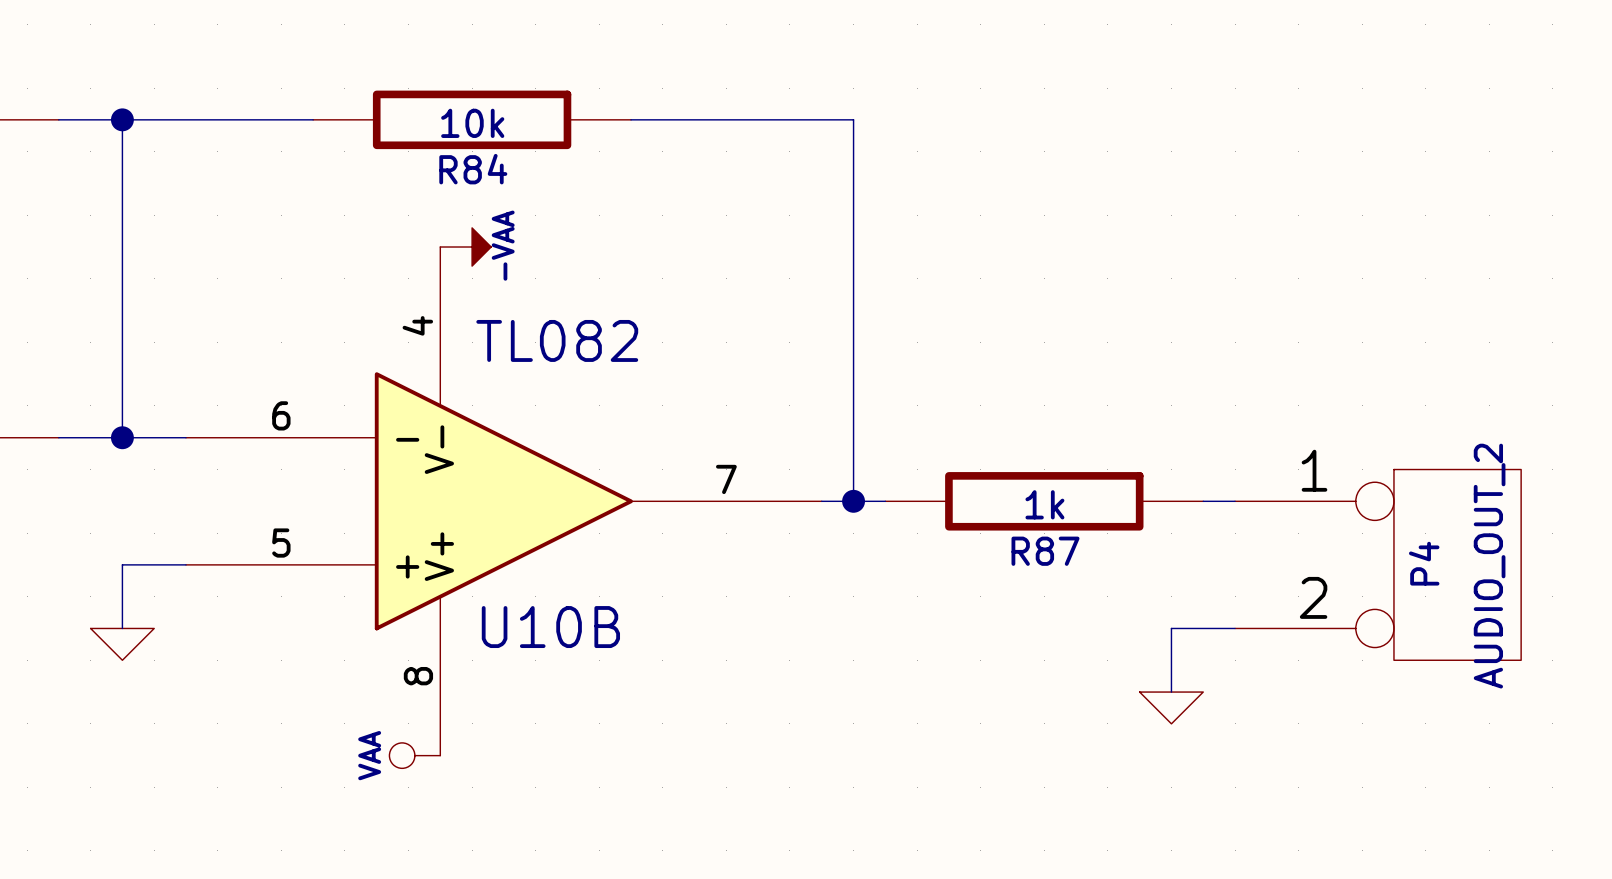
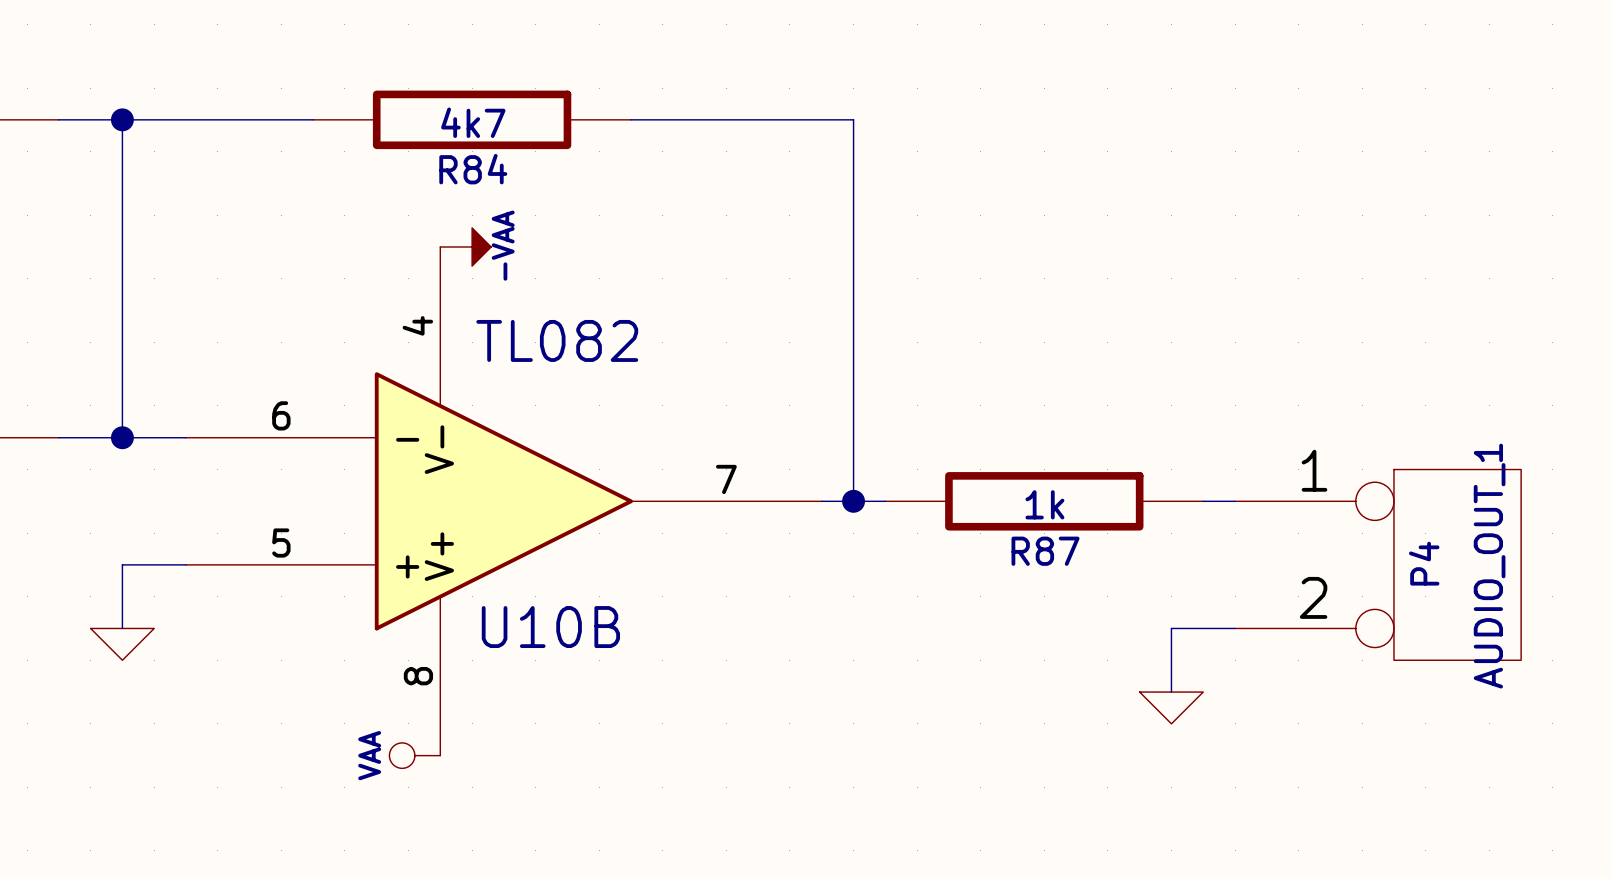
R84 value: 10k (472, 123) -> 4k7 (473, 122)
P4 value: AUDIO_OUT_2 (1489, 566) -> AUDIO_OUT_1 (1489, 566)

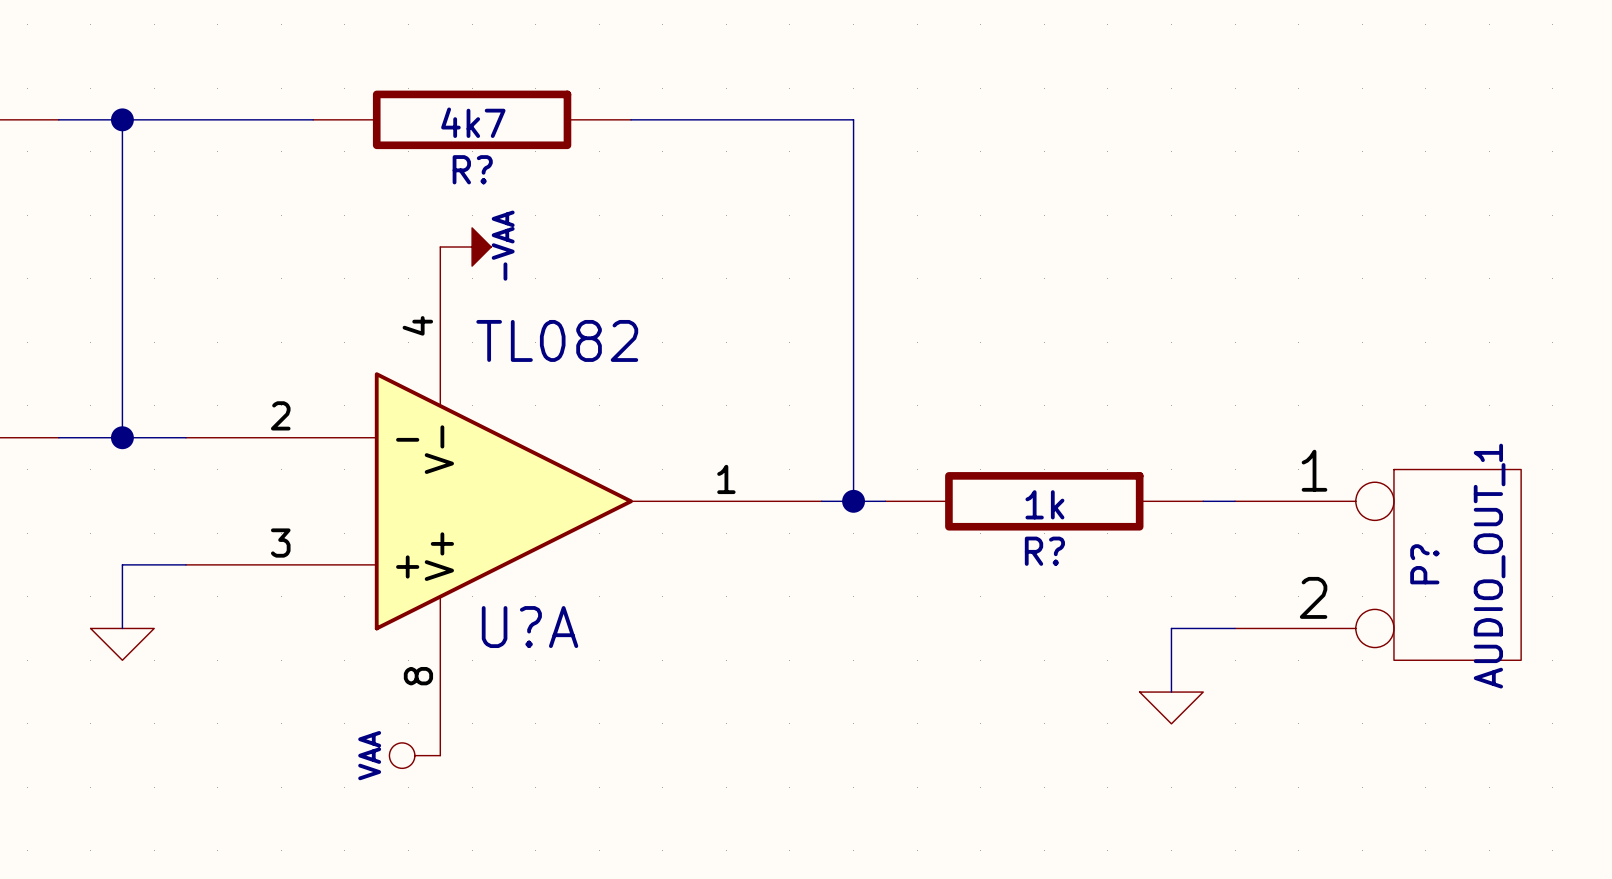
R84 name: R84 (473, 169) -> R? (472, 169)
U10B pin number: 6 (281, 415) -> 2 (280, 415)
U10B pin number: 7 (726, 479) -> 1 (726, 479)
U10B pin number: 5 (281, 543) -> 3 (280, 543)
R87 name: R87 (1045, 551) -> R? (1044, 551)
P4 name: P4 (1424, 563) -> P? (1424, 564)
U10B name: U10B (550, 627) -> U?A (530, 627)

